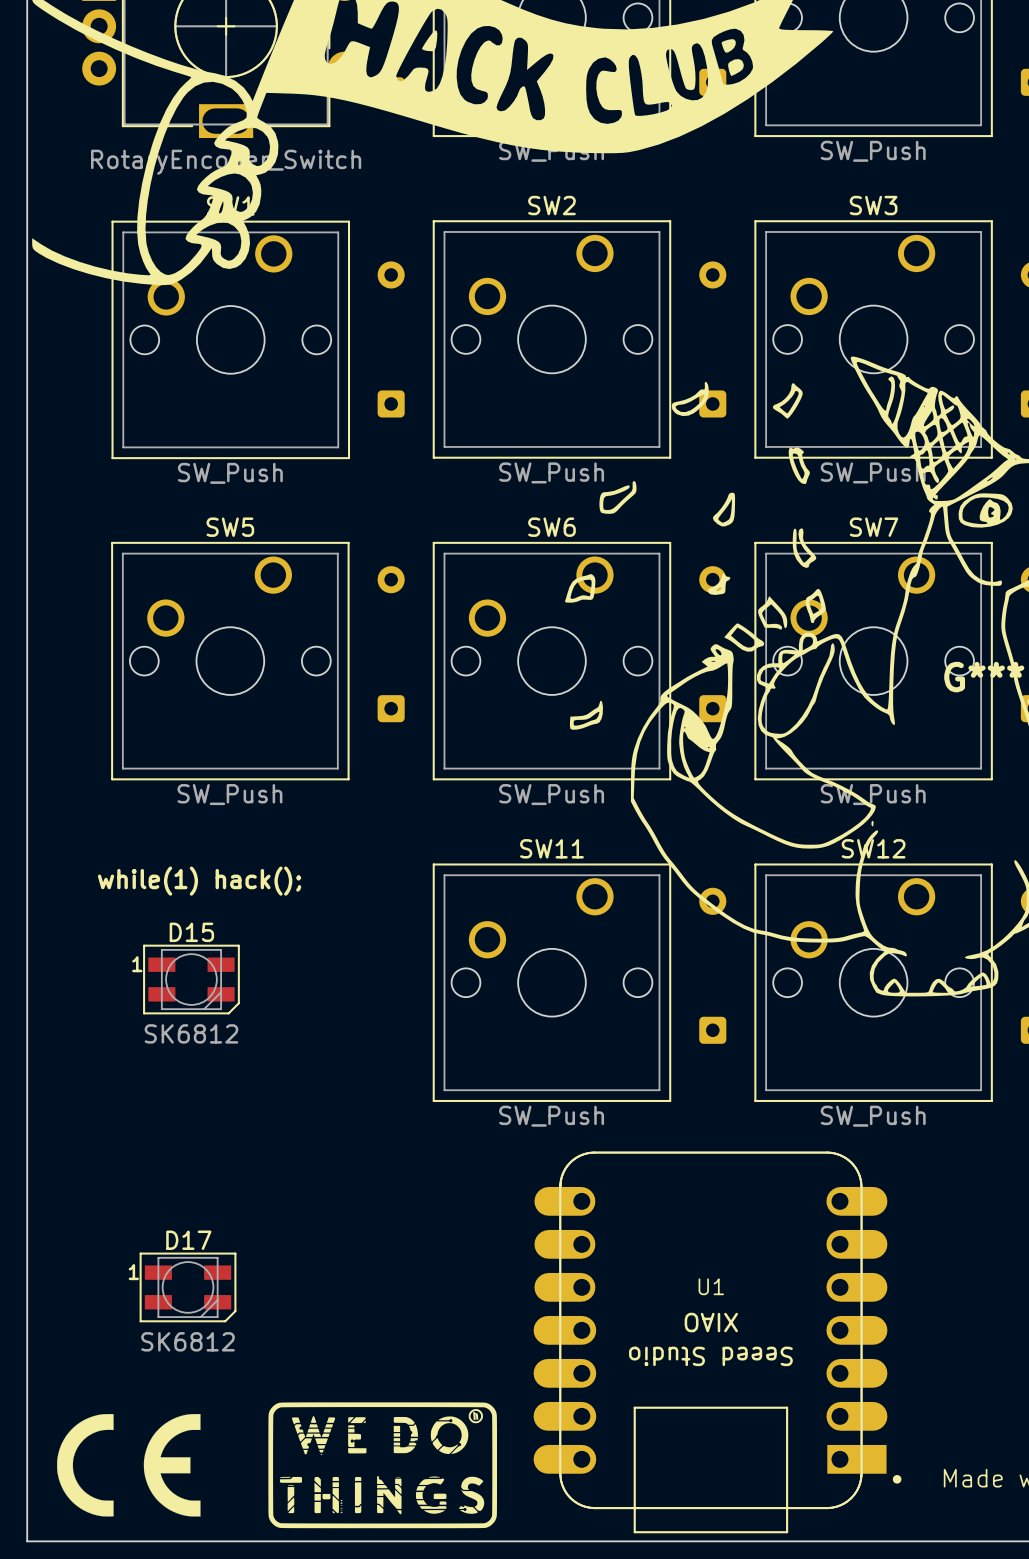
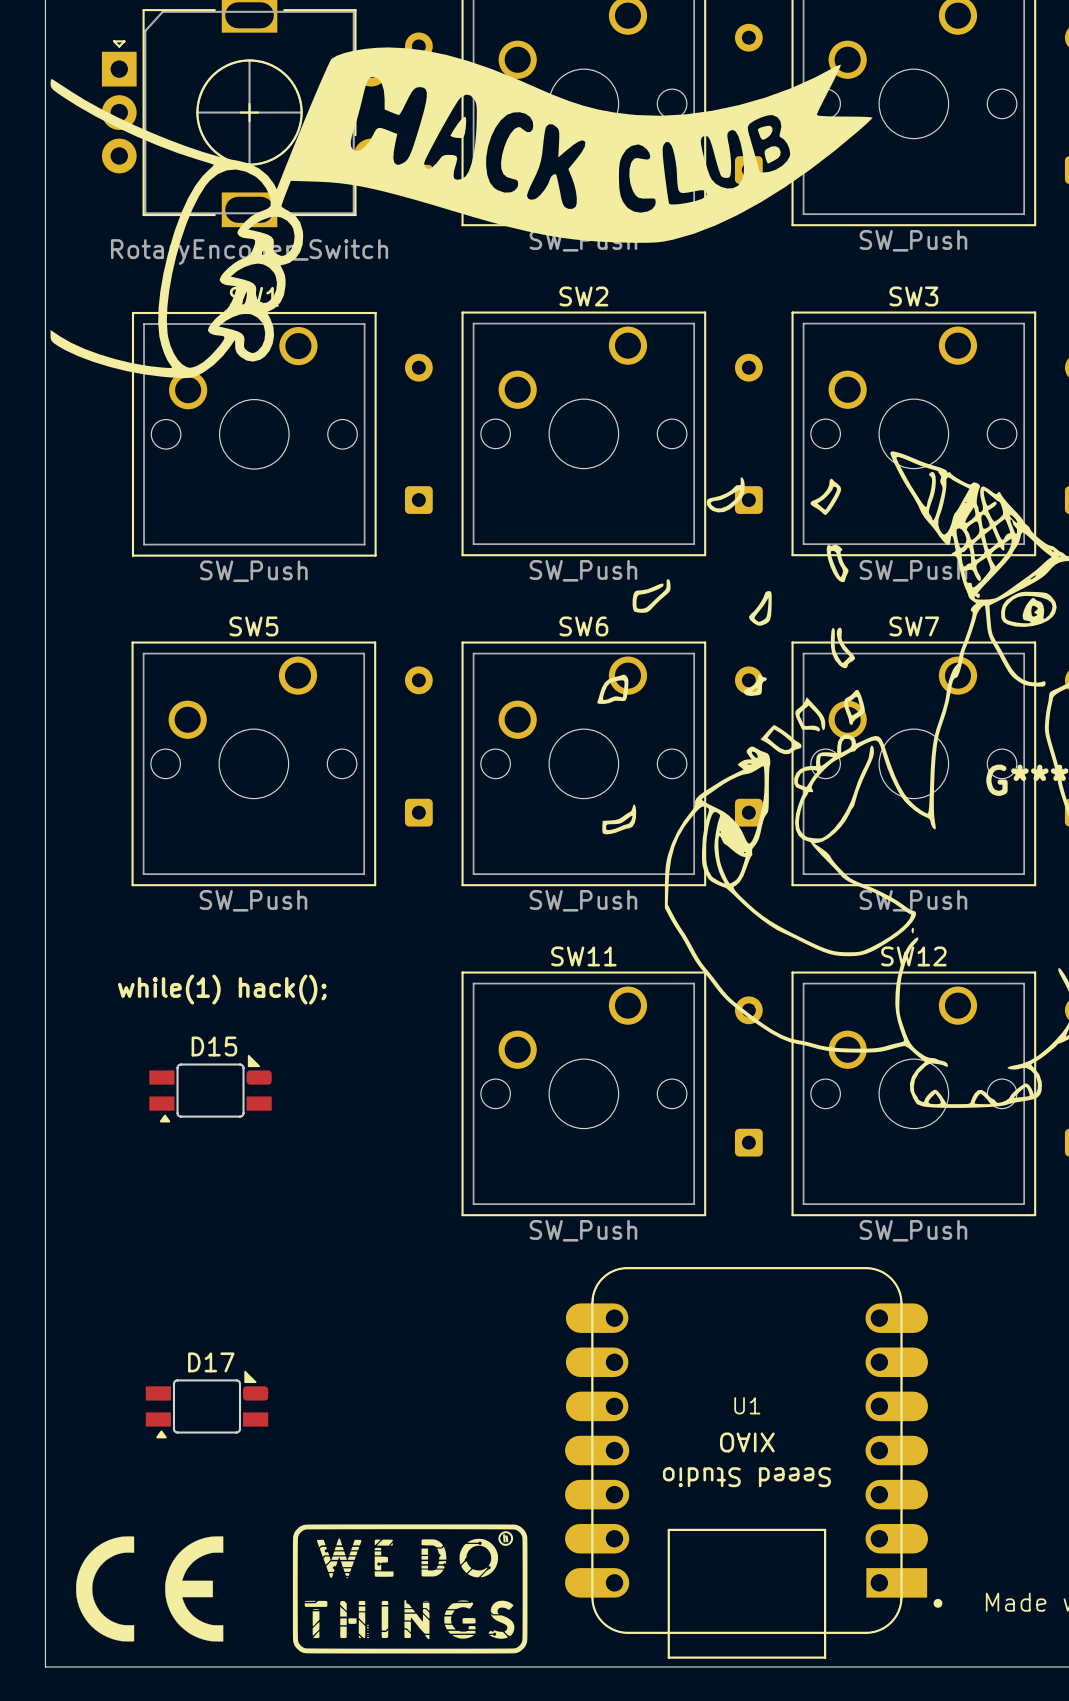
D15 footprint: [143, 944, 240, 1015] -> [149, 1054, 272, 1123]
D15 value: SK6812 (191, 1033) -> none
D17 footprint: [139, 1252, 237, 1323] -> [145, 1370, 269, 1439]
D17 value: SK6812 (188, 1341) -> none

